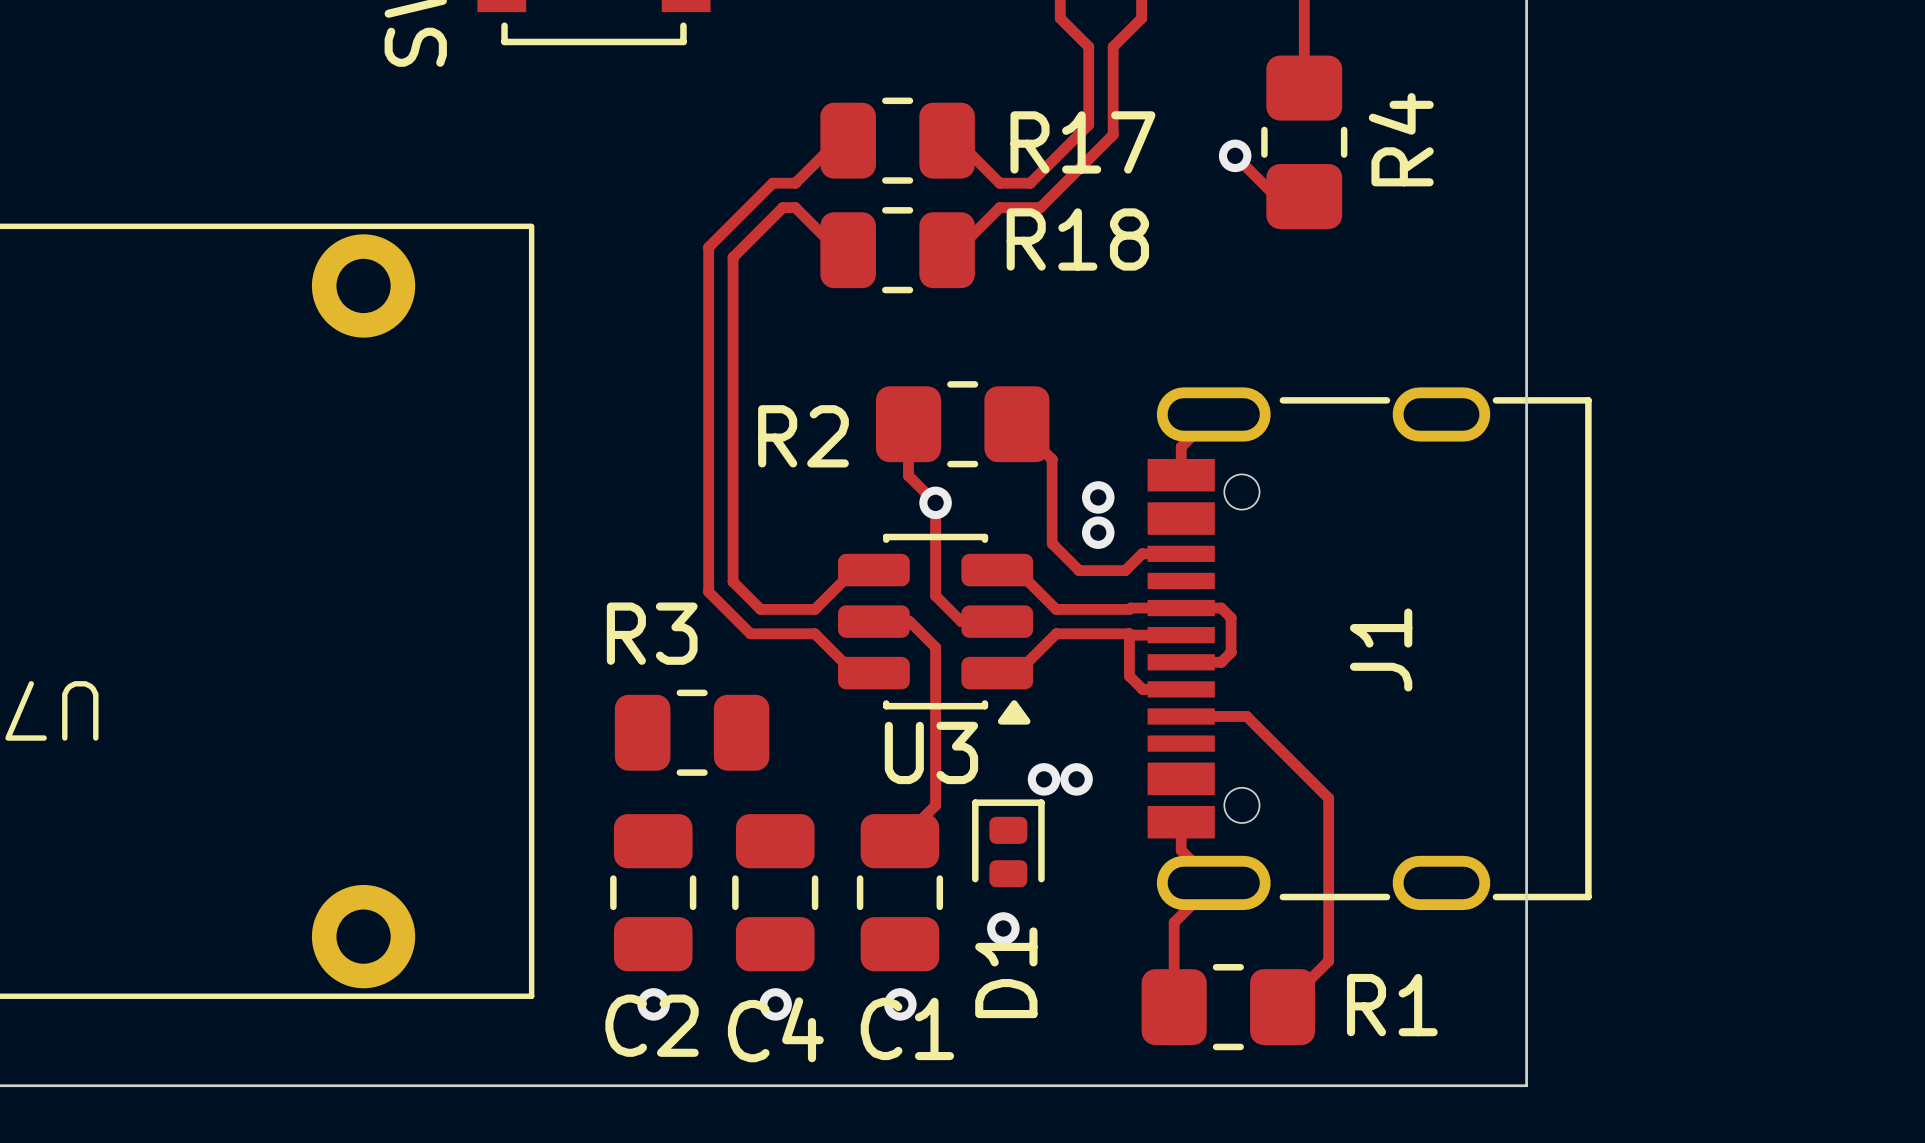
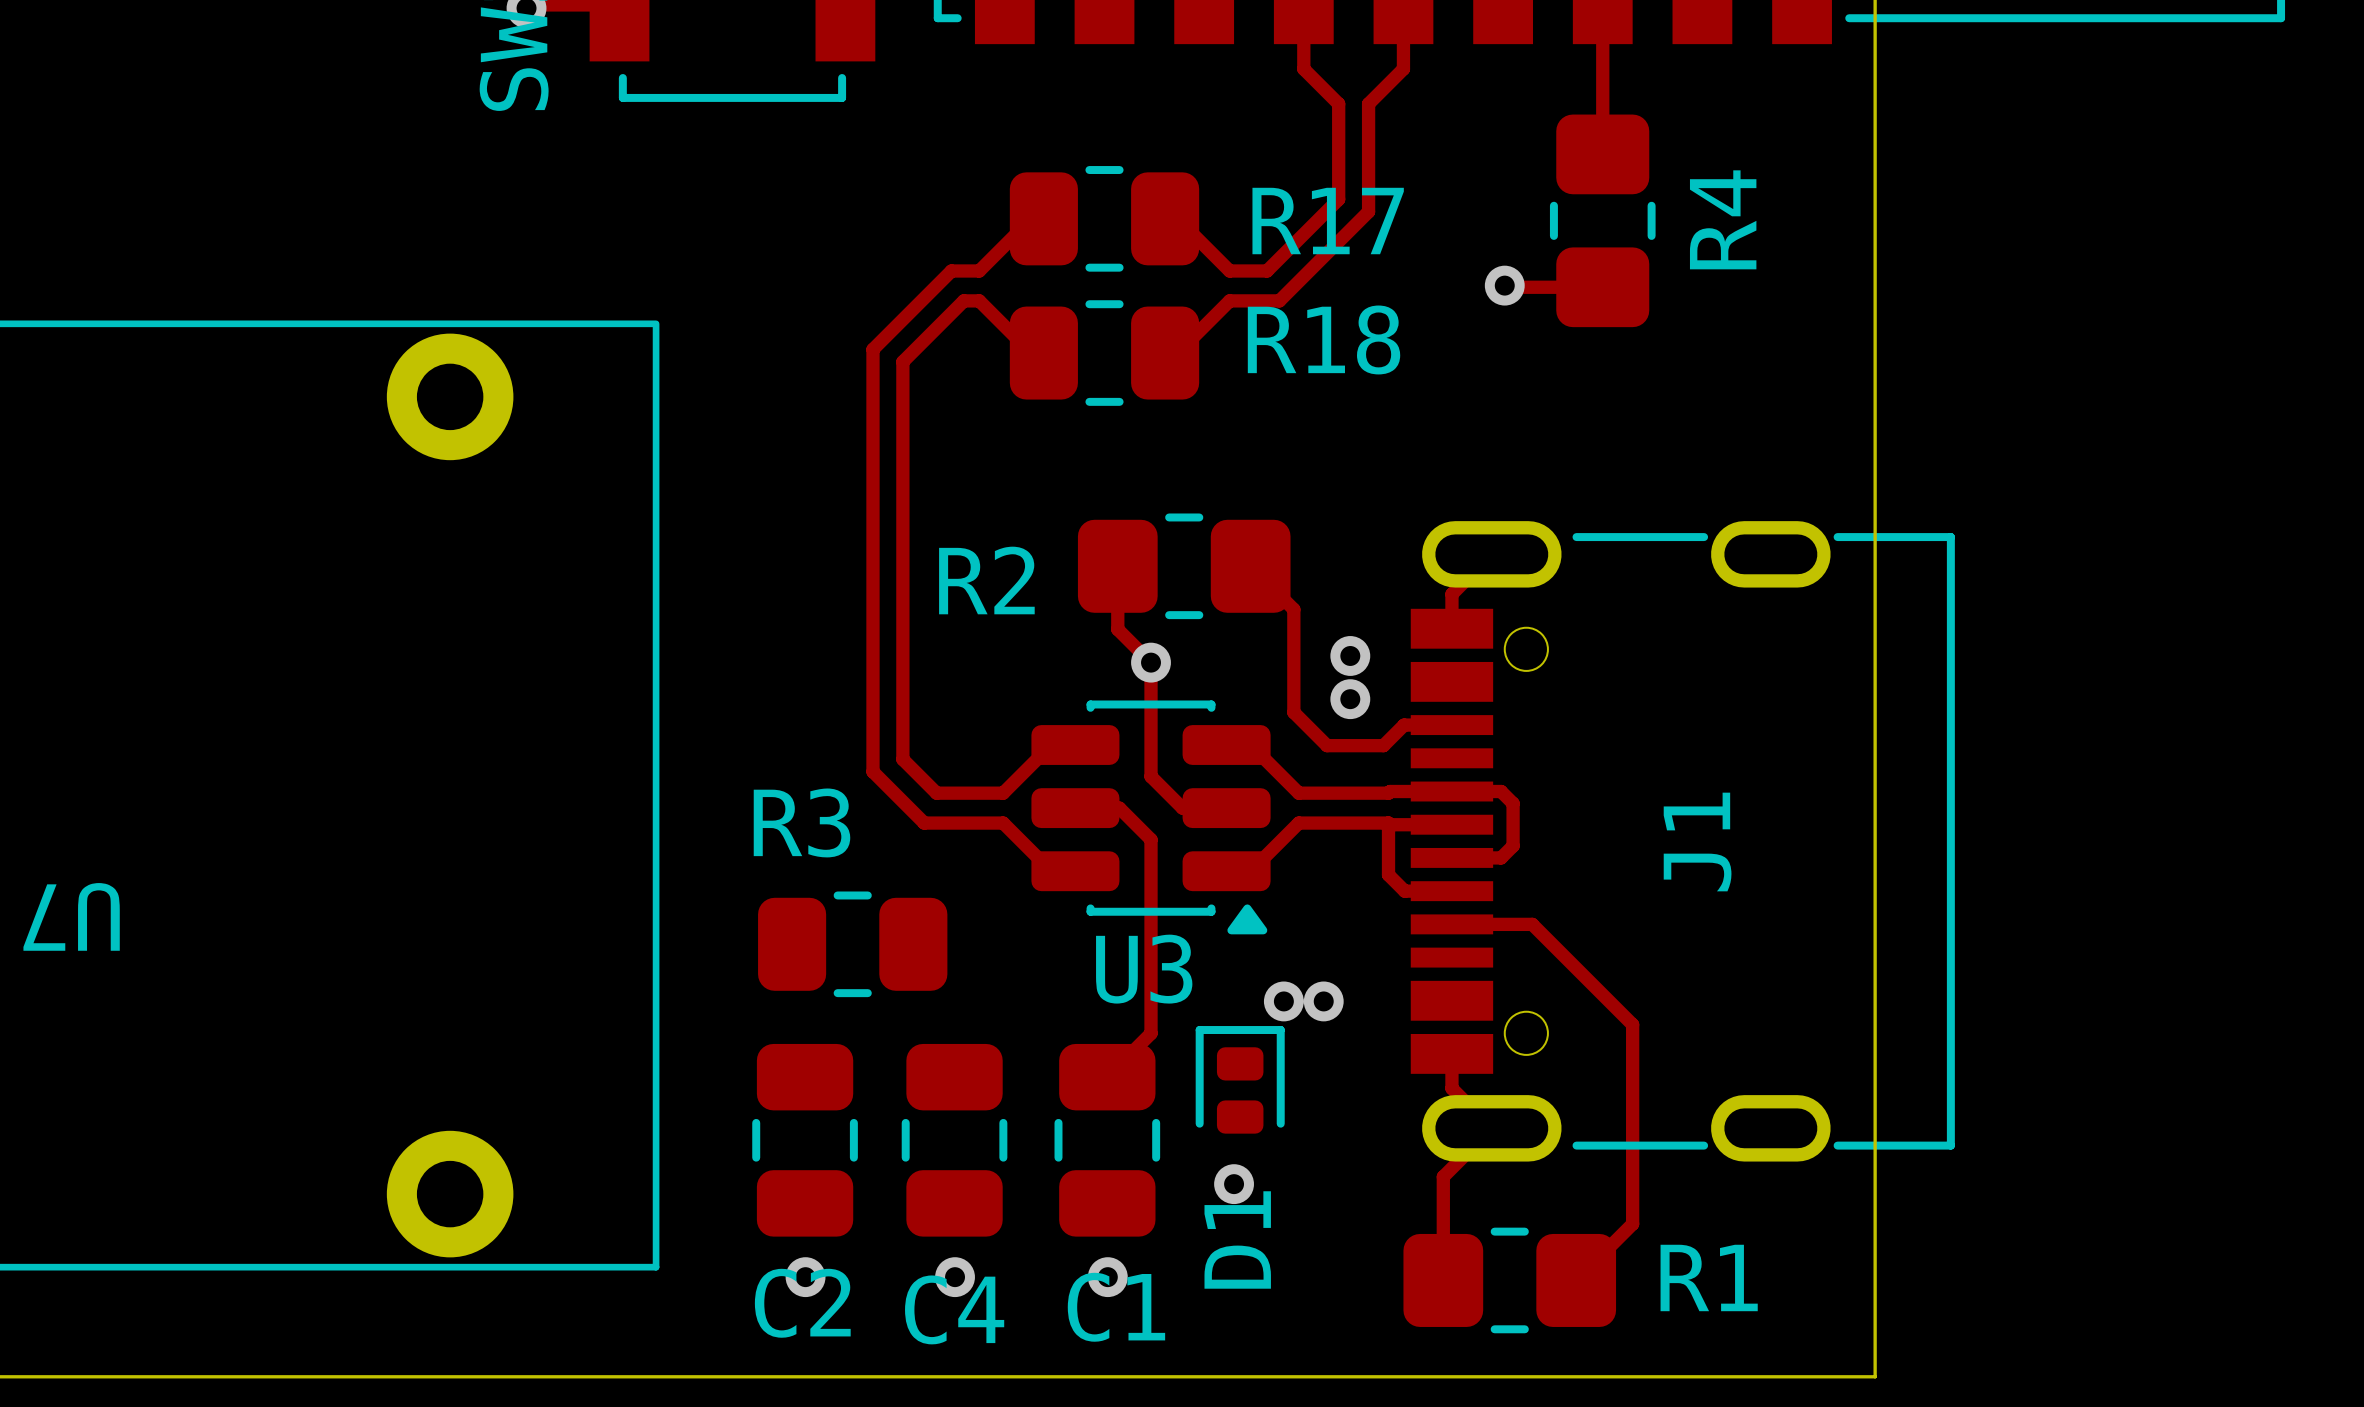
top track: (1235, 155) (1275, 196) -> (1504, 285) (1506, 287) (1567, 287)
via position: (1235, 155) -> (1504, 285)

